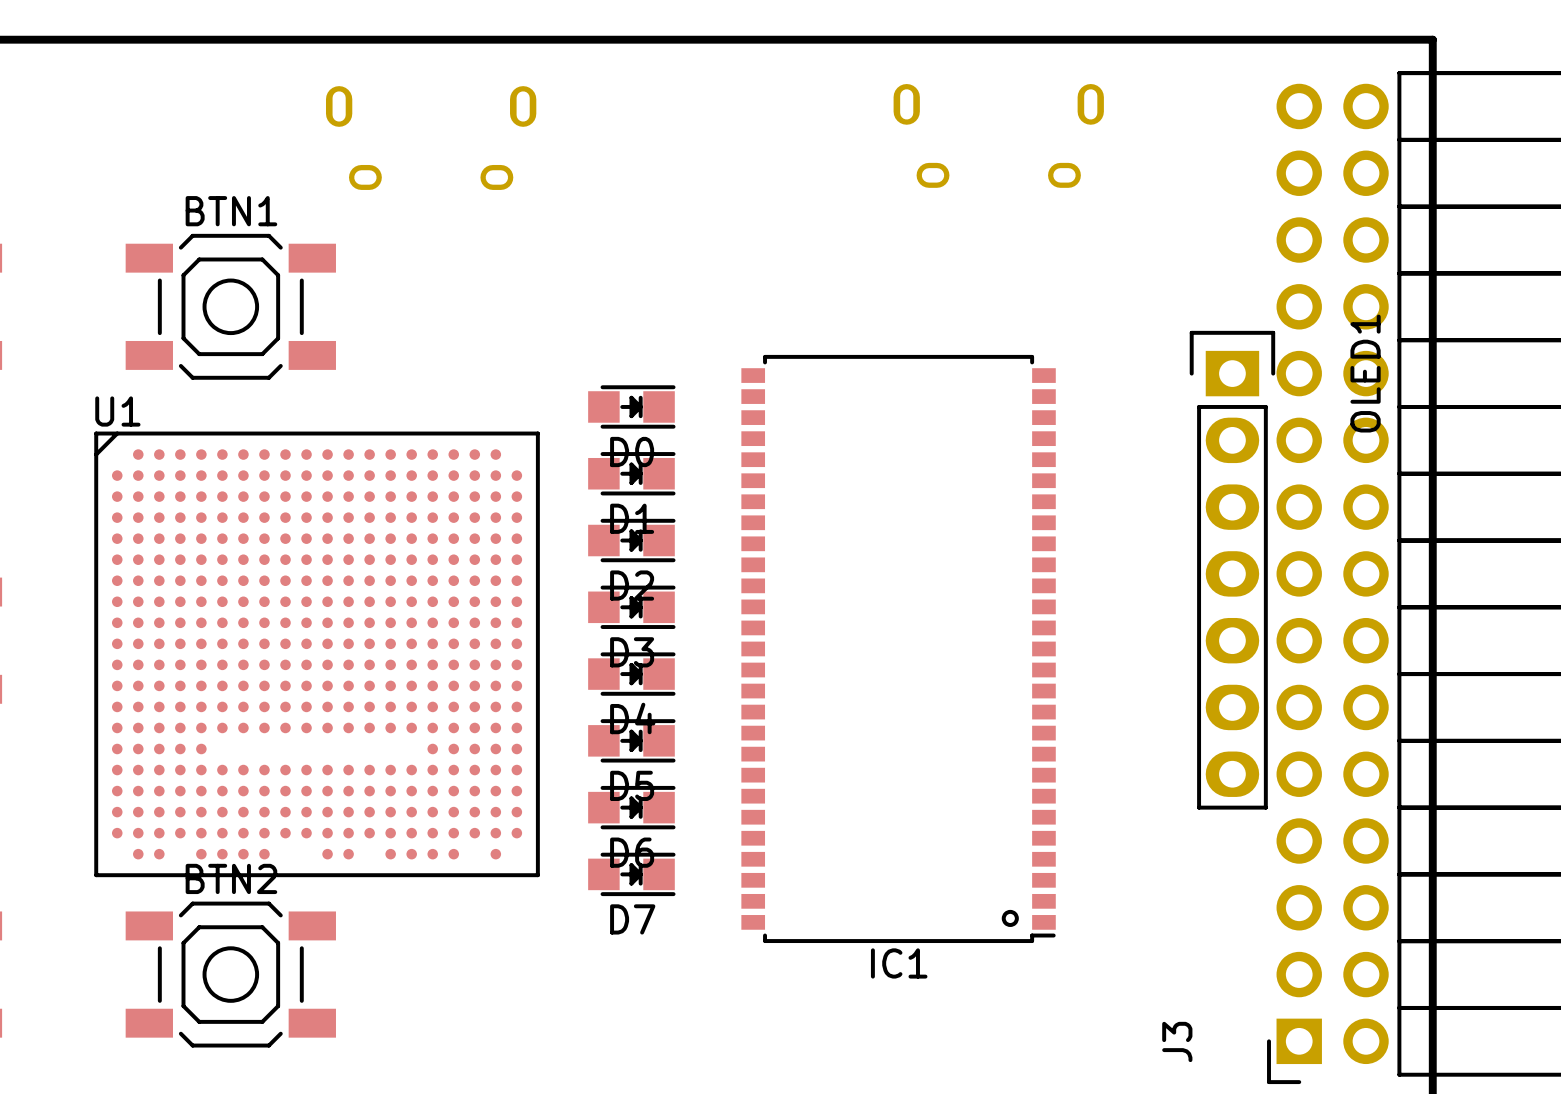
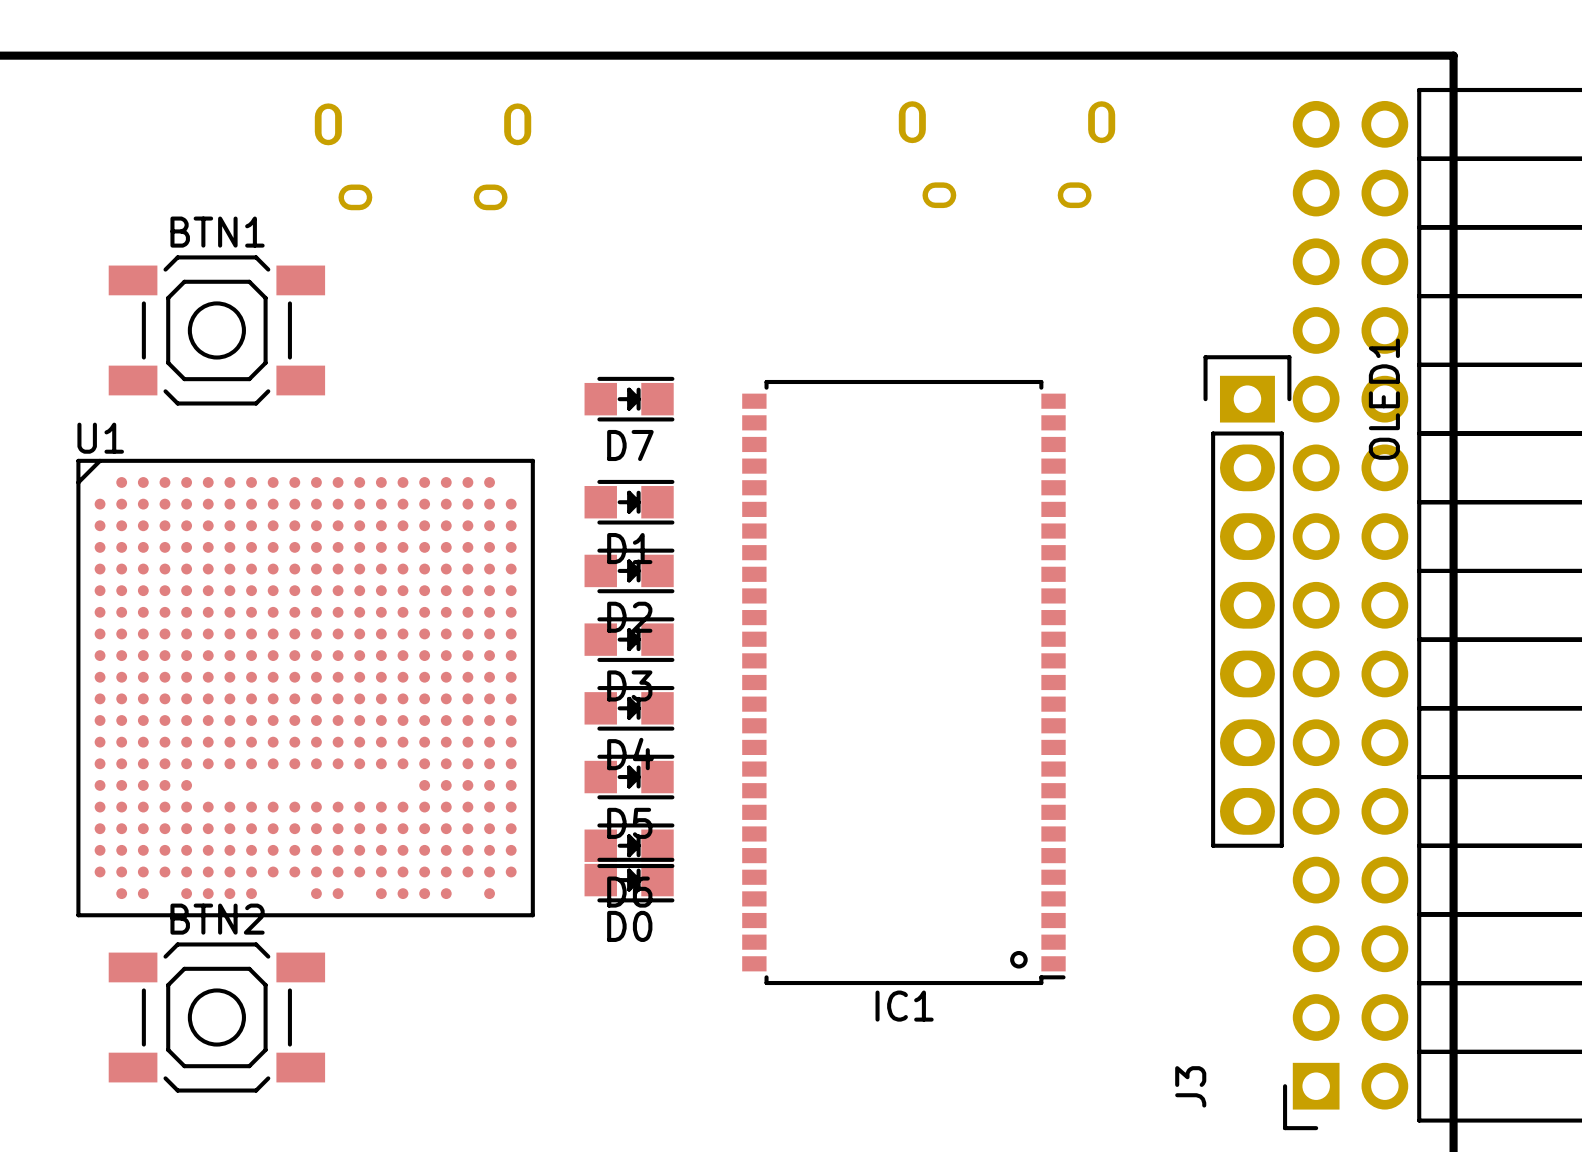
D0 position: (631, 406) -> (629, 880)
D7 position: (631, 874) -> (629, 399)

